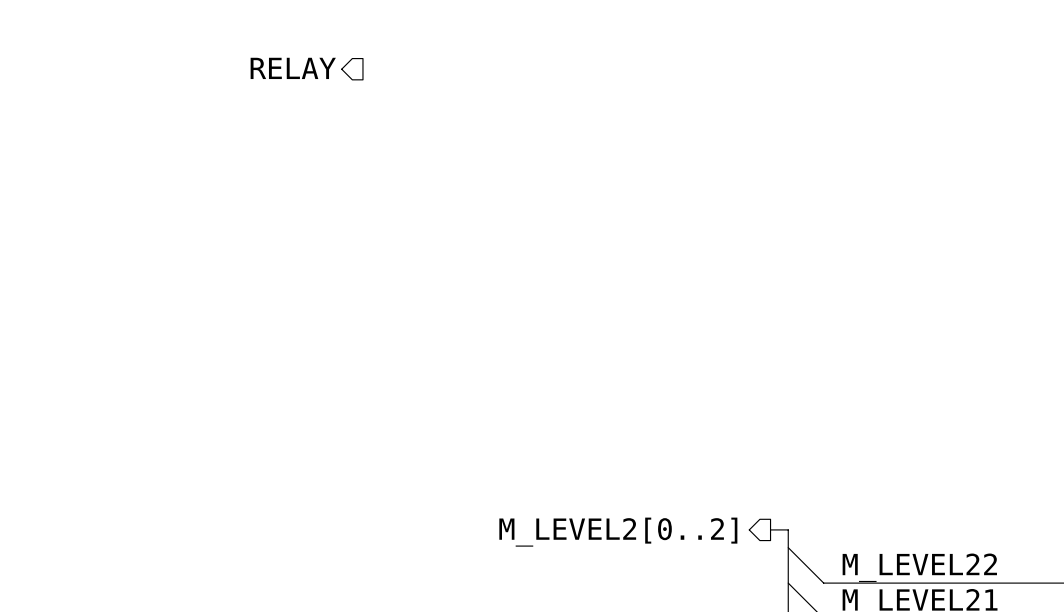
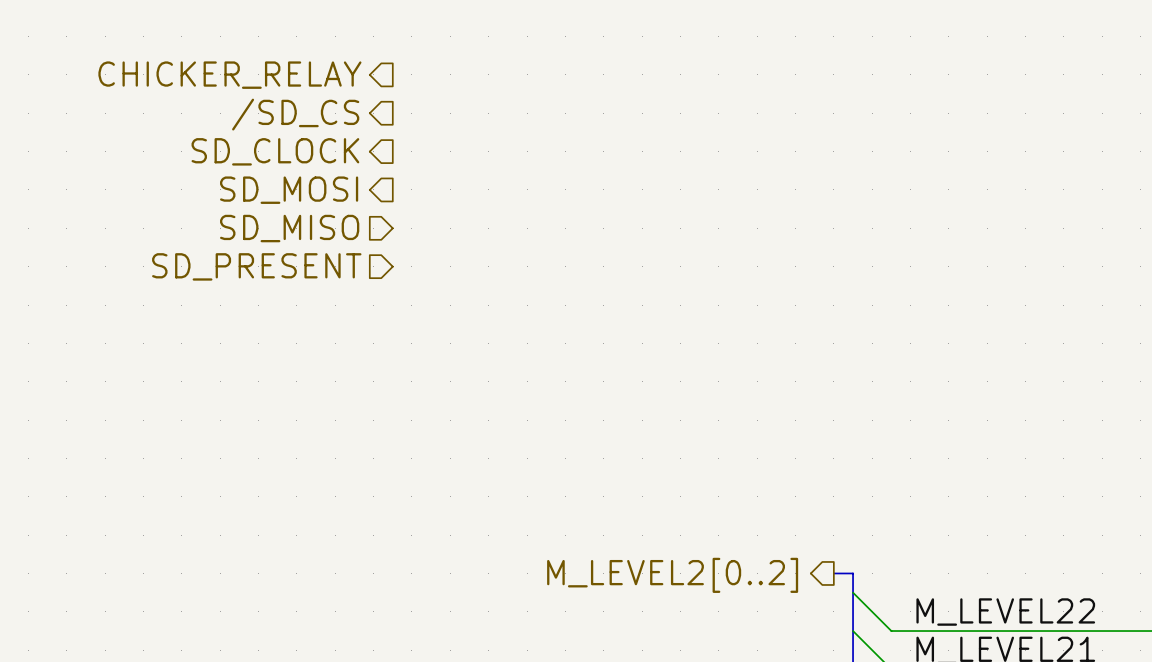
hierarchical label: RELAY (293, 68) -> CHICKER_RELAY (229, 75)
hierarchical label: none -> /SD_CS (295, 114)
hierarchical label: none -> SD_CLOCK (275, 151)
hierarchical label: none -> SD_MOSI (289, 190)
hierarchical label: none -> SD_MISO (289, 228)
hierarchical label: none -> SD_PRESENT (256, 266)

